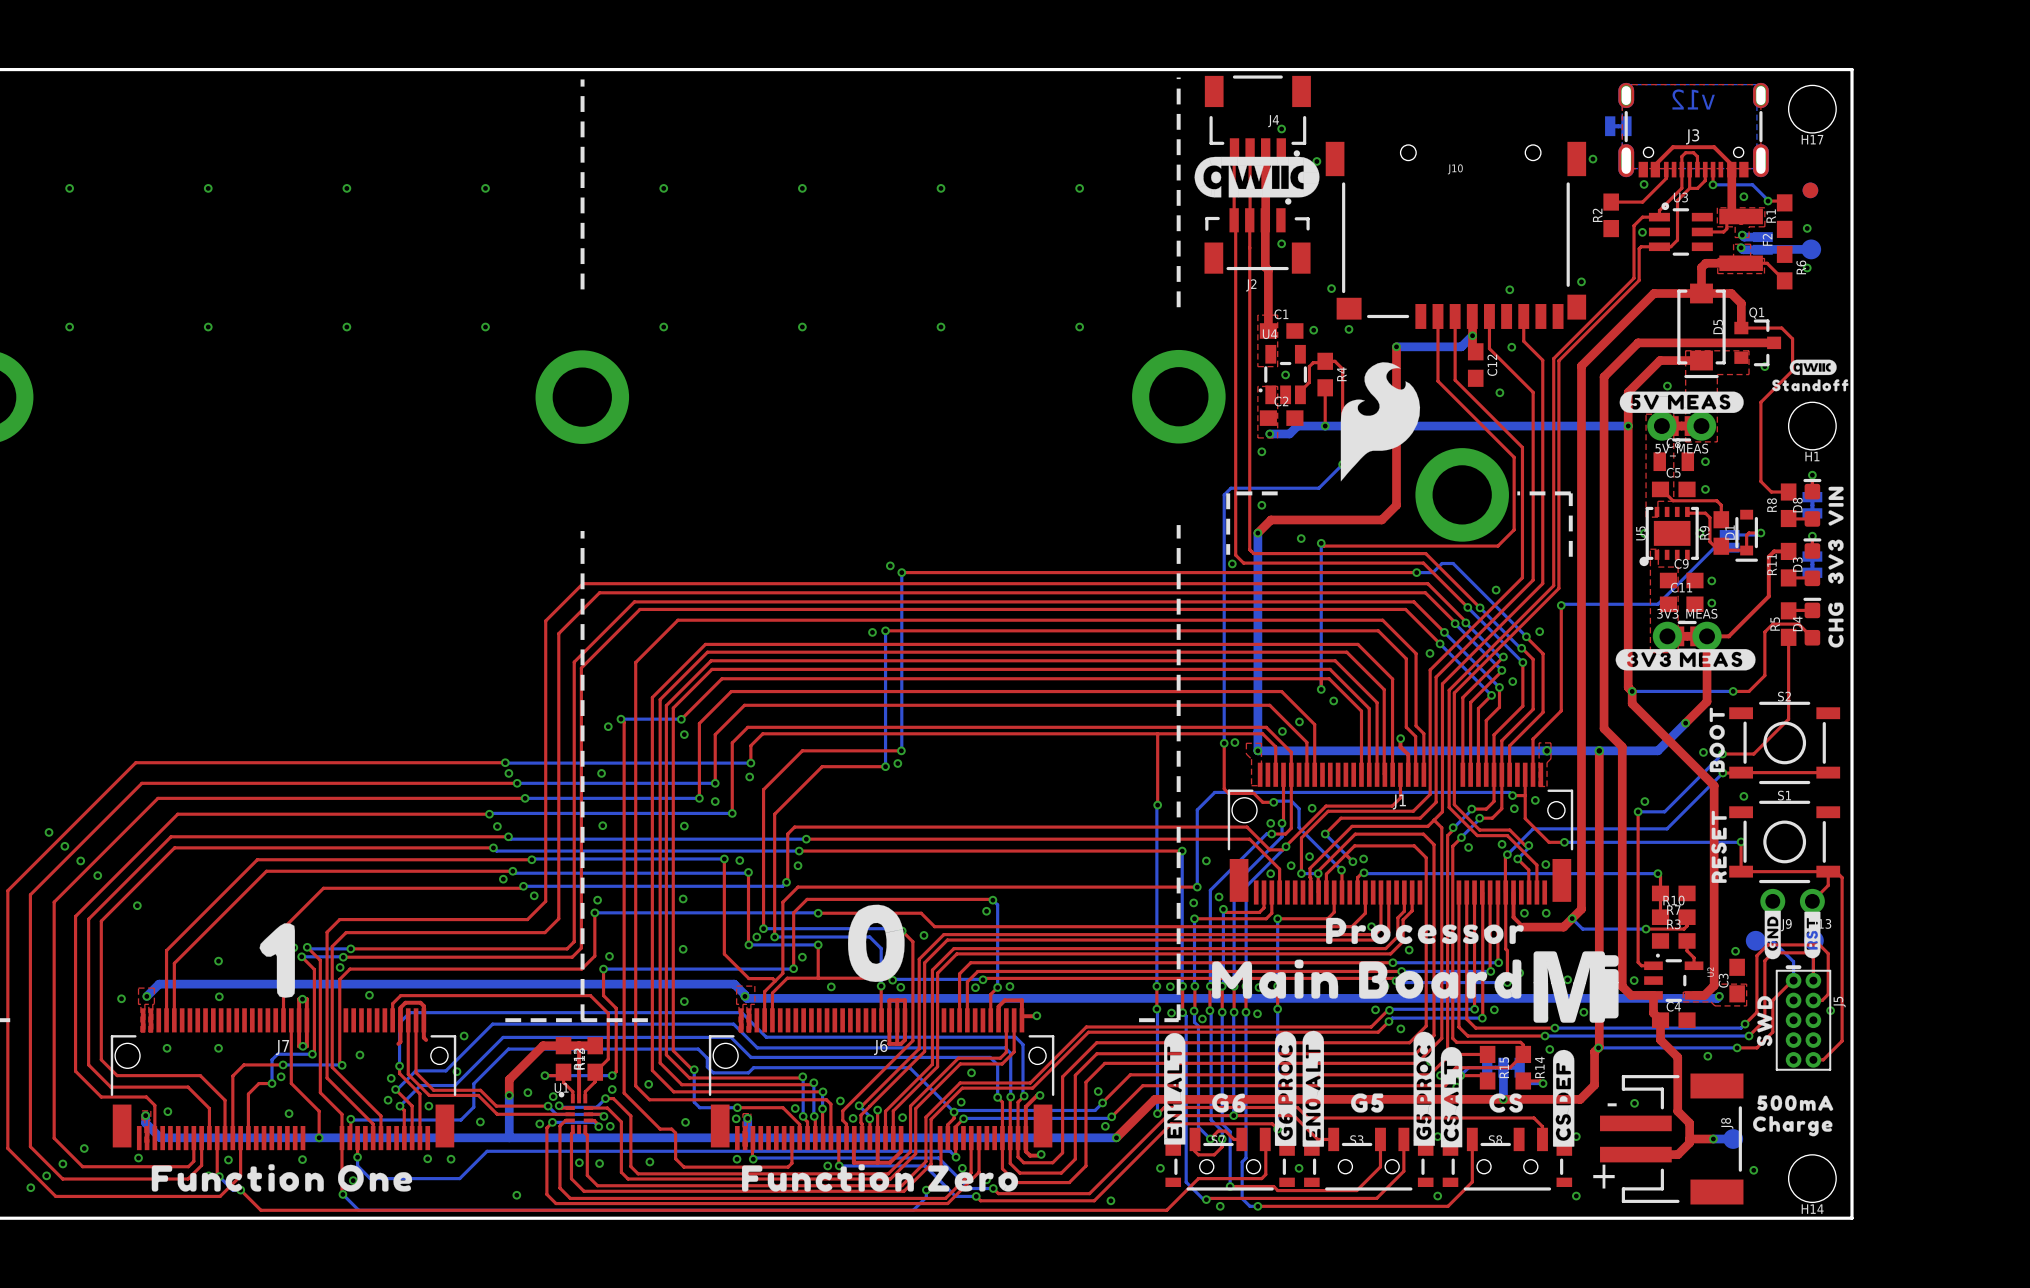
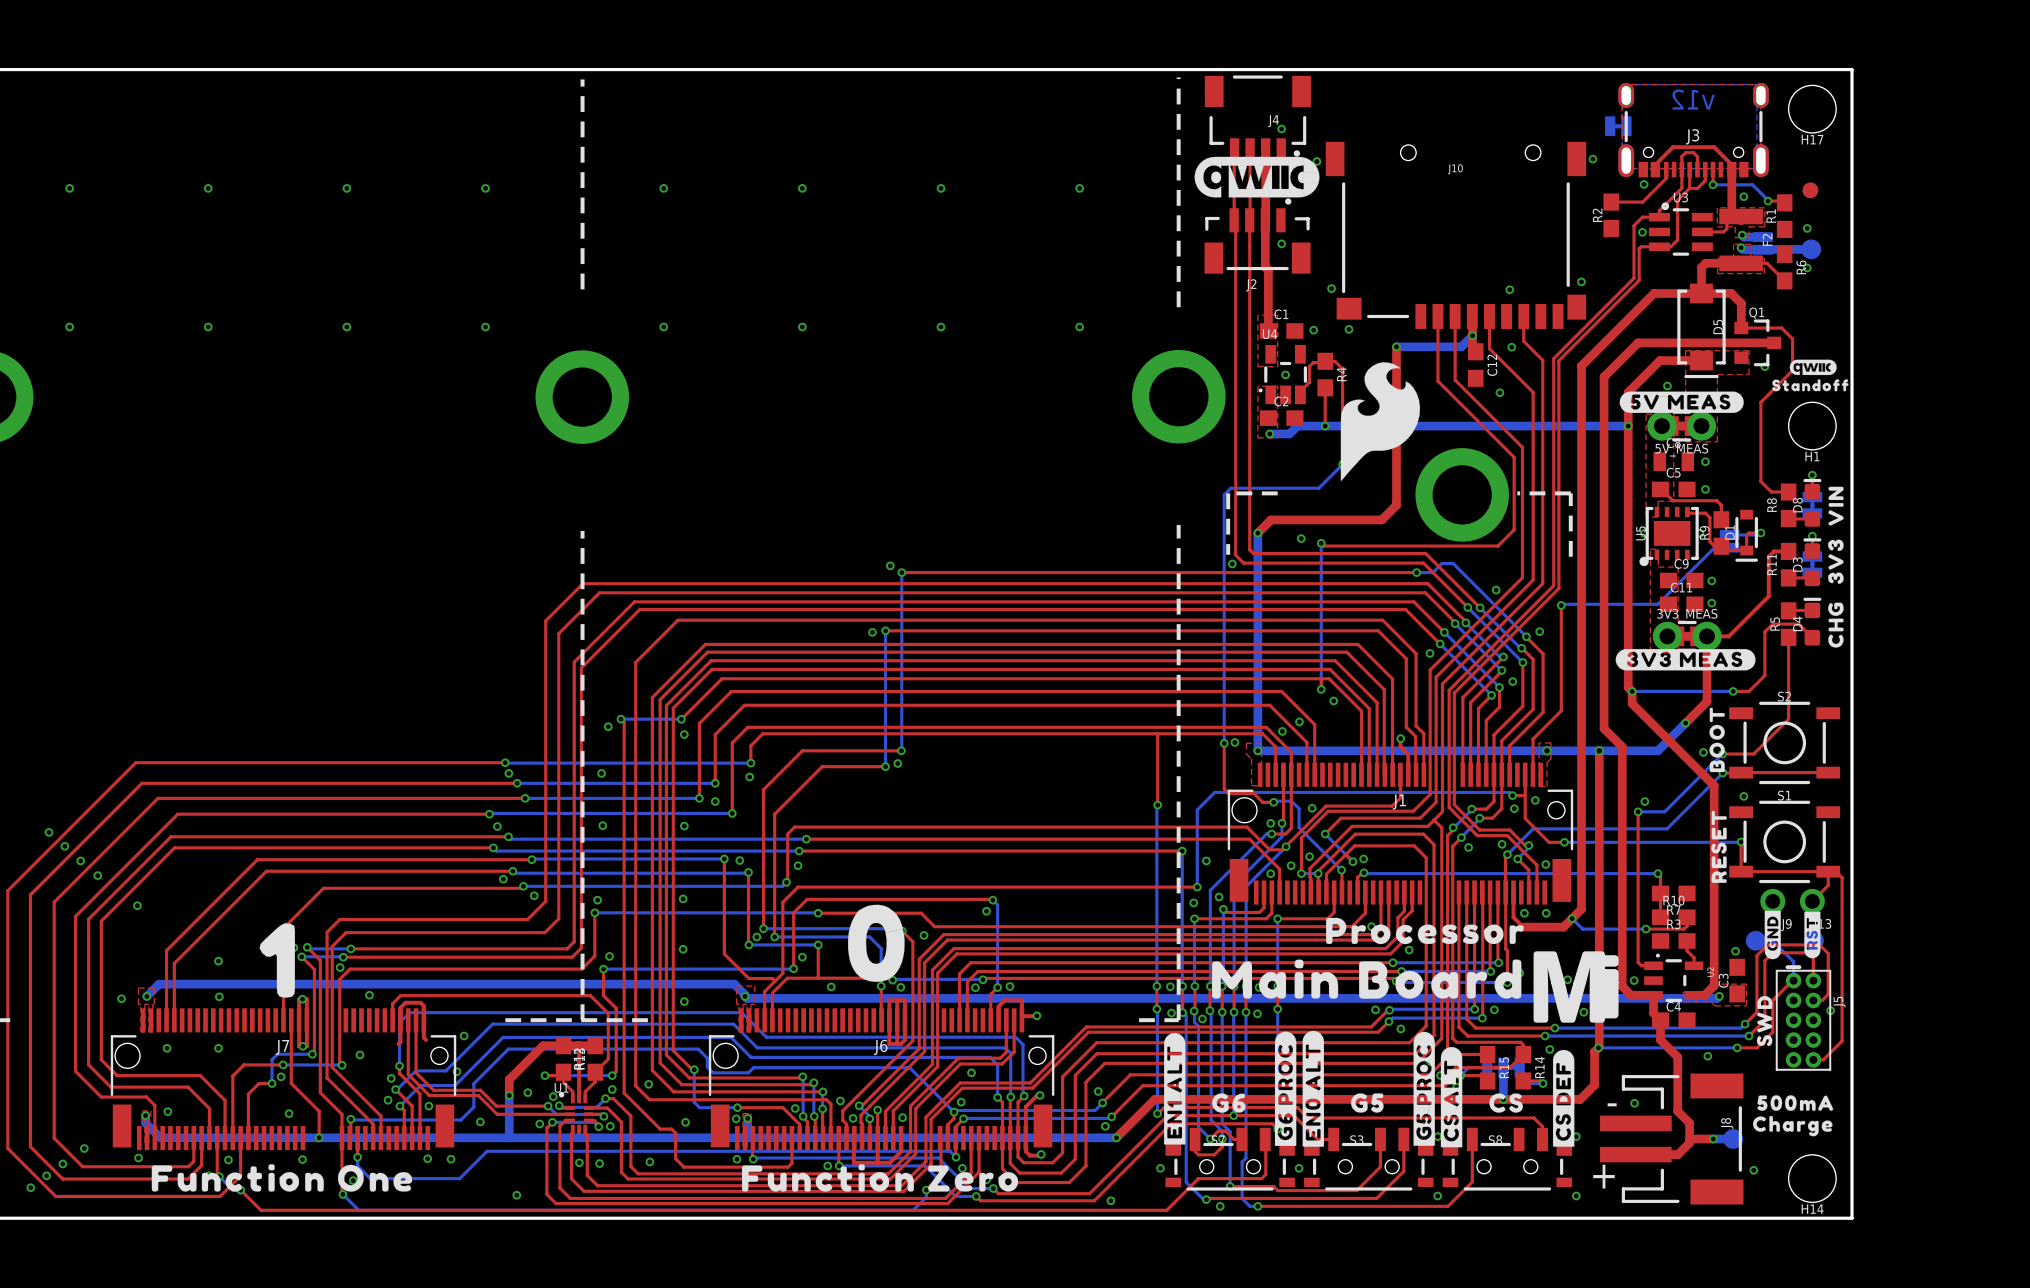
via: (1261, 451) -> none
via: (1261, 505) -> none

